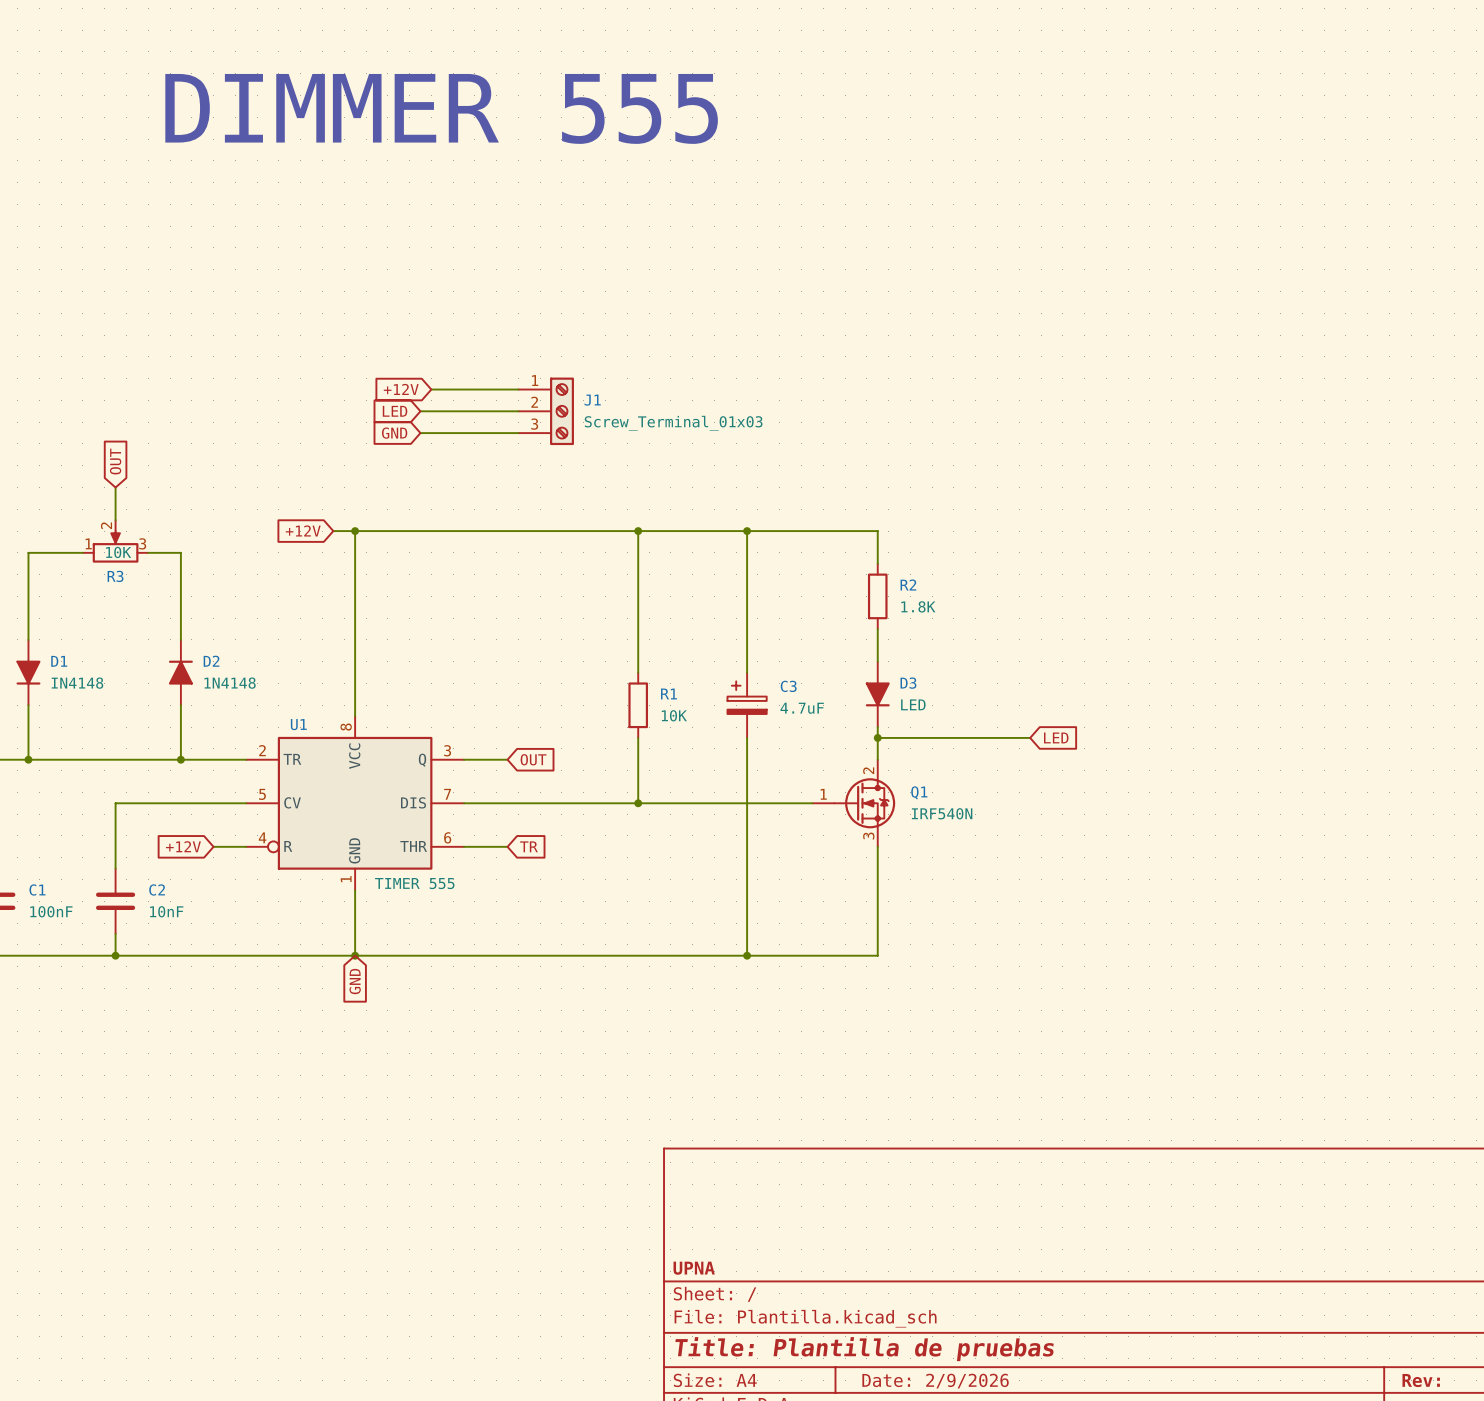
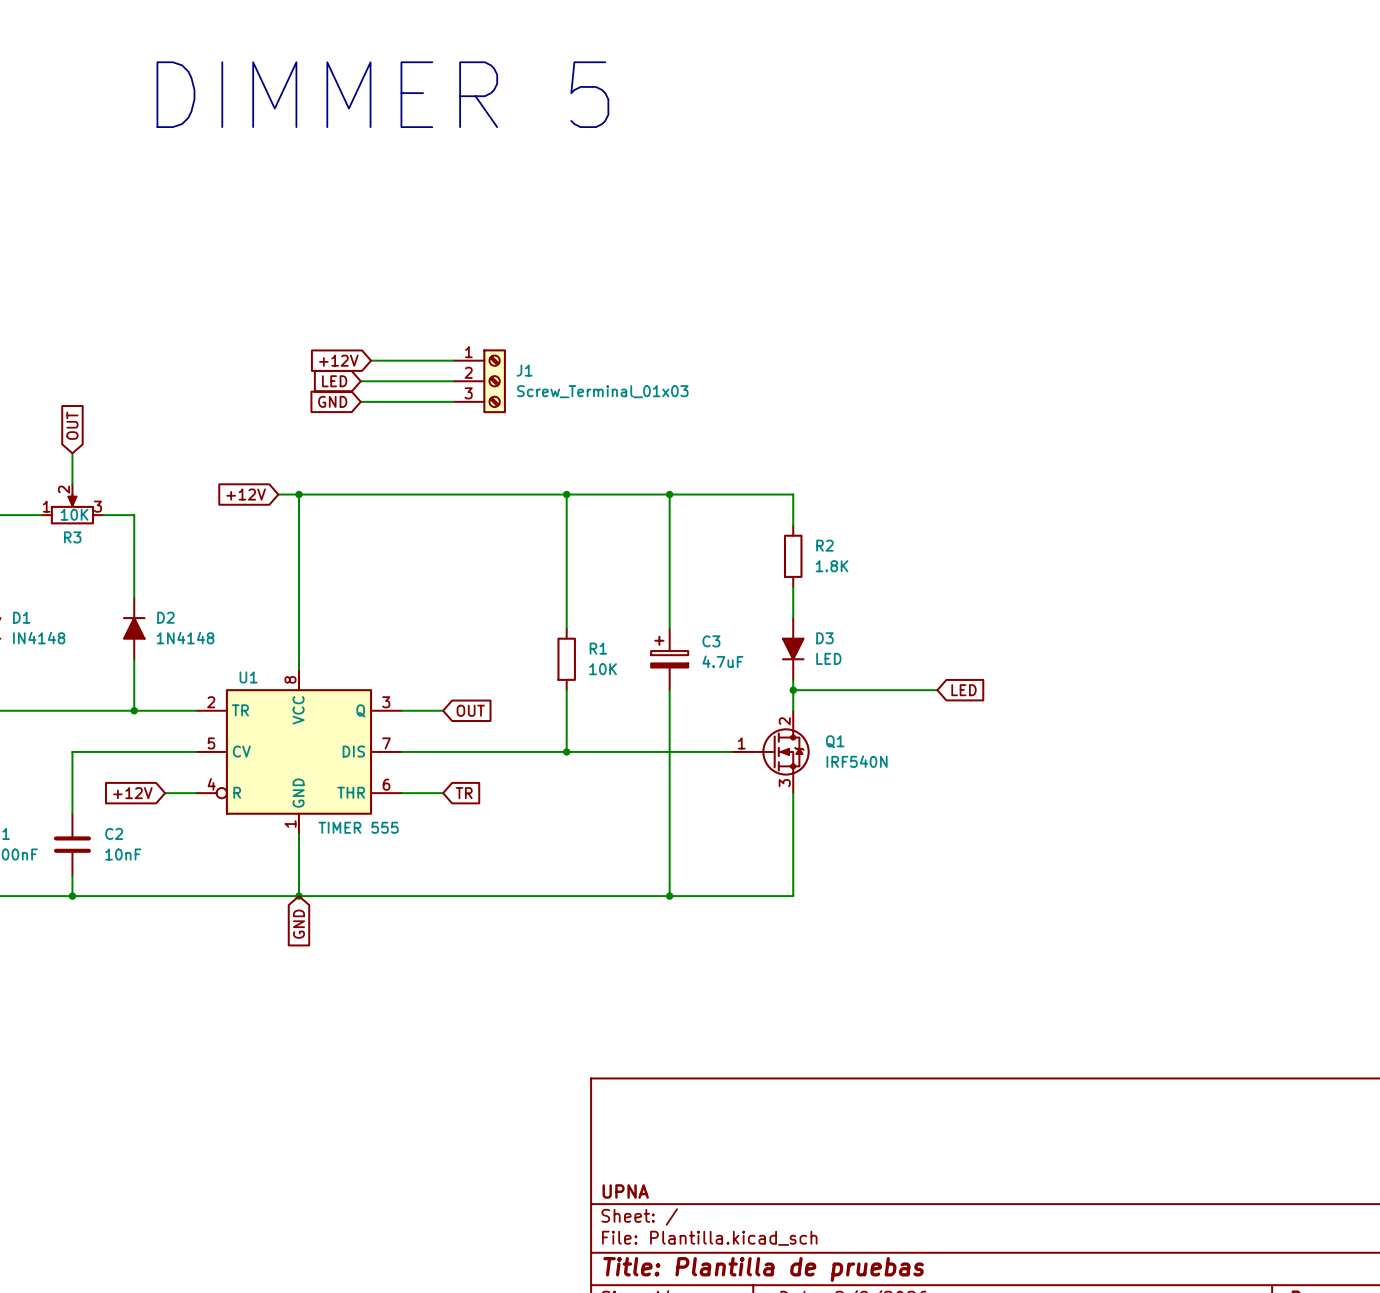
text: DIMMER 555 (441, 108) -> DIMMER 5 (382, 94)

